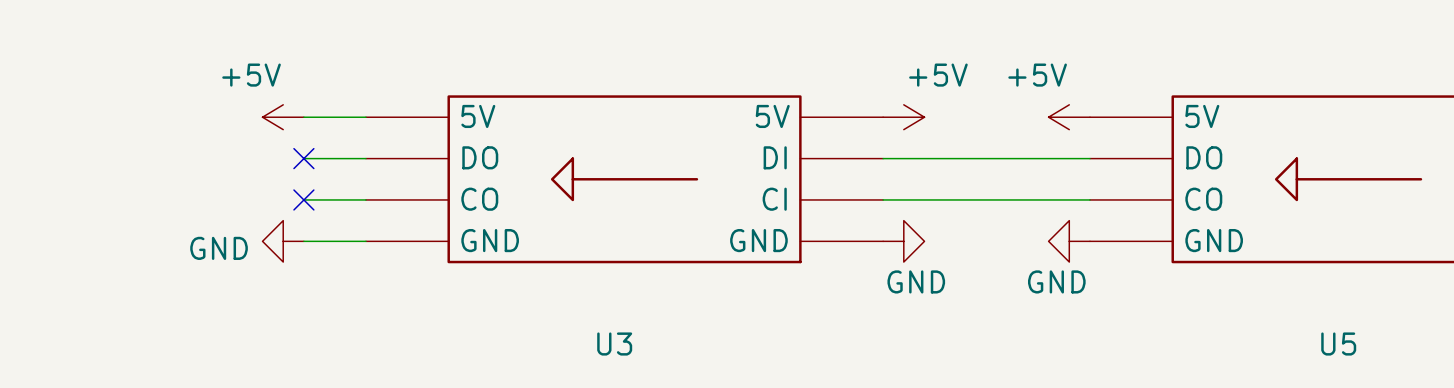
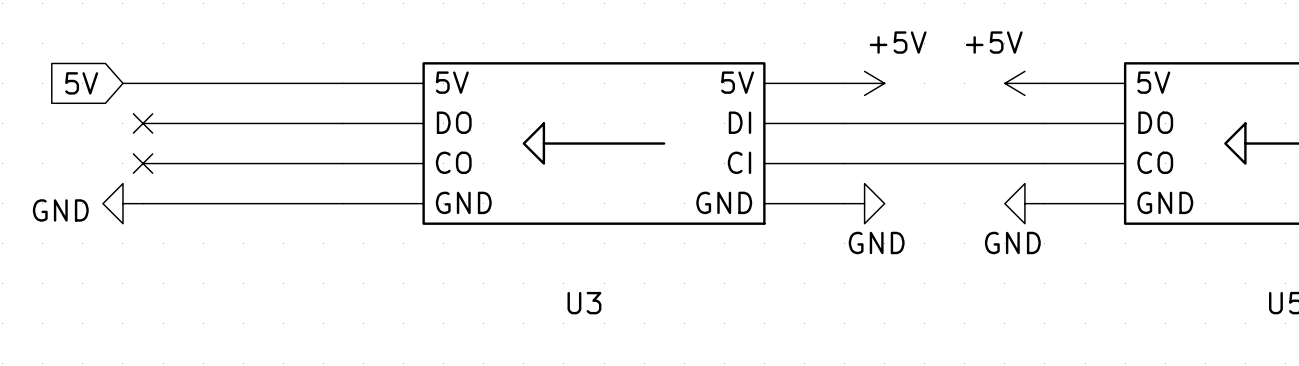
global label: none -> 5V (81, 83)
wire: none -> (122, 83) (283, 83)
power symbol: +5V (283, 117) -> none
wire: none -> (143, 123) (283, 123)
no-connect mark: none -> (143, 123)
no-connect mark: (303, 158) -> none
wire: none -> (143, 163) (283, 163)
no-connect mark: none -> (143, 163)
no-connect mark: (303, 199) -> none
wire: none -> (143, 203) (283, 203)
power symbol position: GND (283, 241) -> GND (122, 203)

